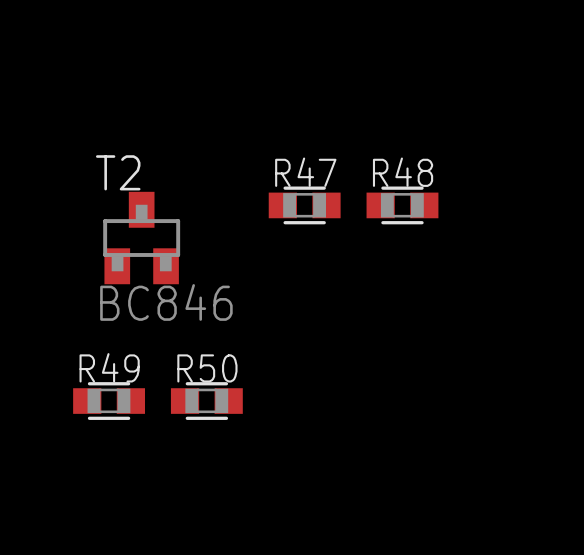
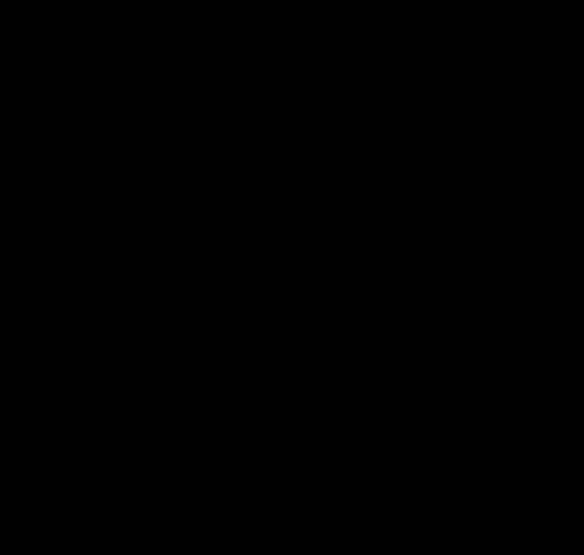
R47: (304, 205) -> none
R48: (402, 205) -> none
T2: BC846 (141, 238) -> none
R49: (109, 401) -> none
R50: (206, 401) -> none

